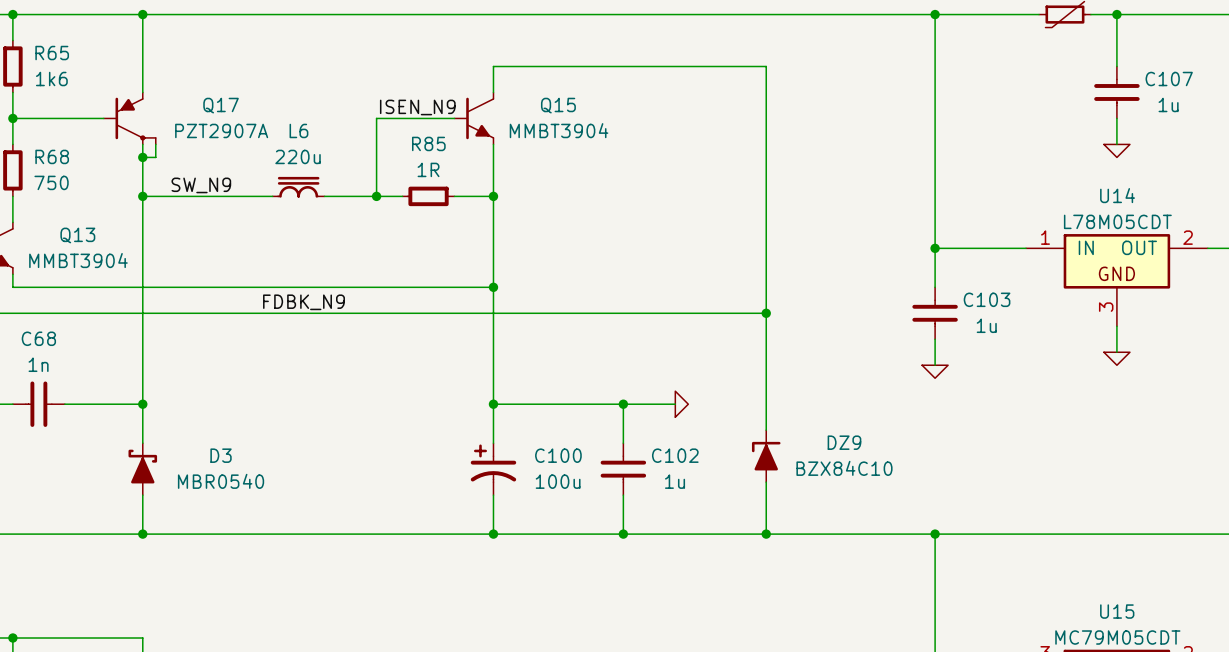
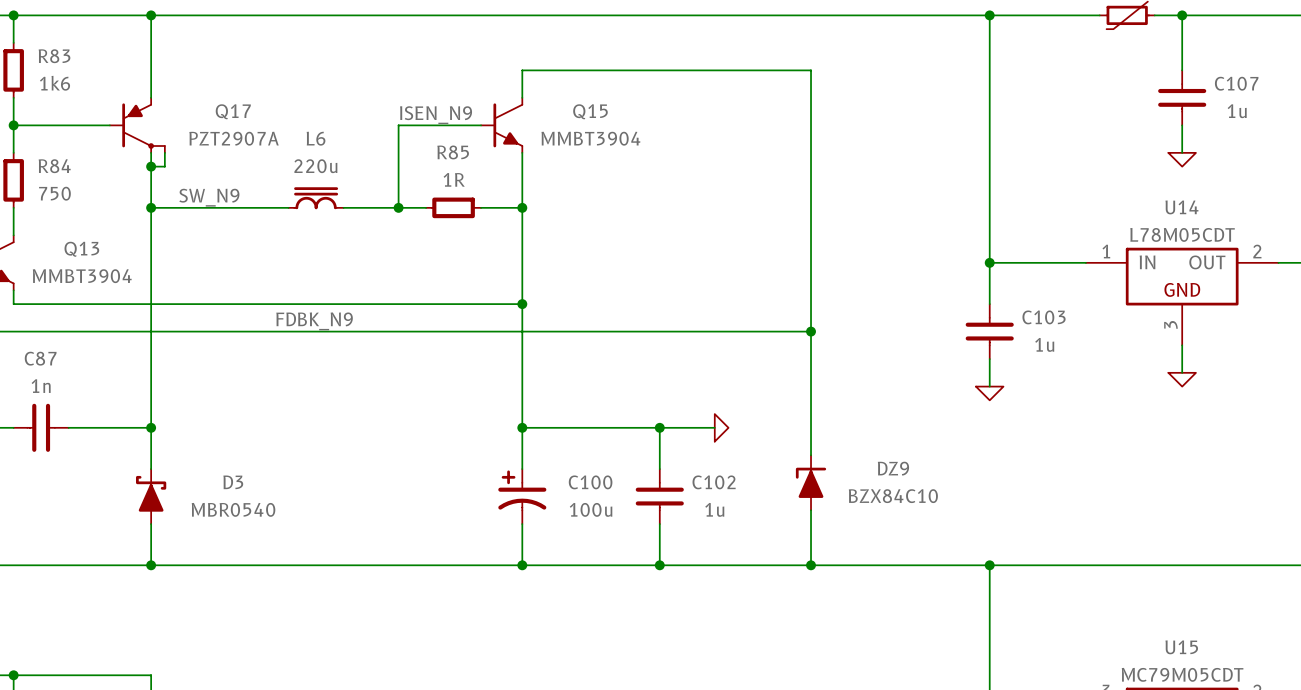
R65 name: R65 (52, 53) -> R83 (54, 56)
R68 name: R68 (52, 156) -> R84 (54, 166)
C68 name: C68 (38, 338) -> C87 (40, 358)

